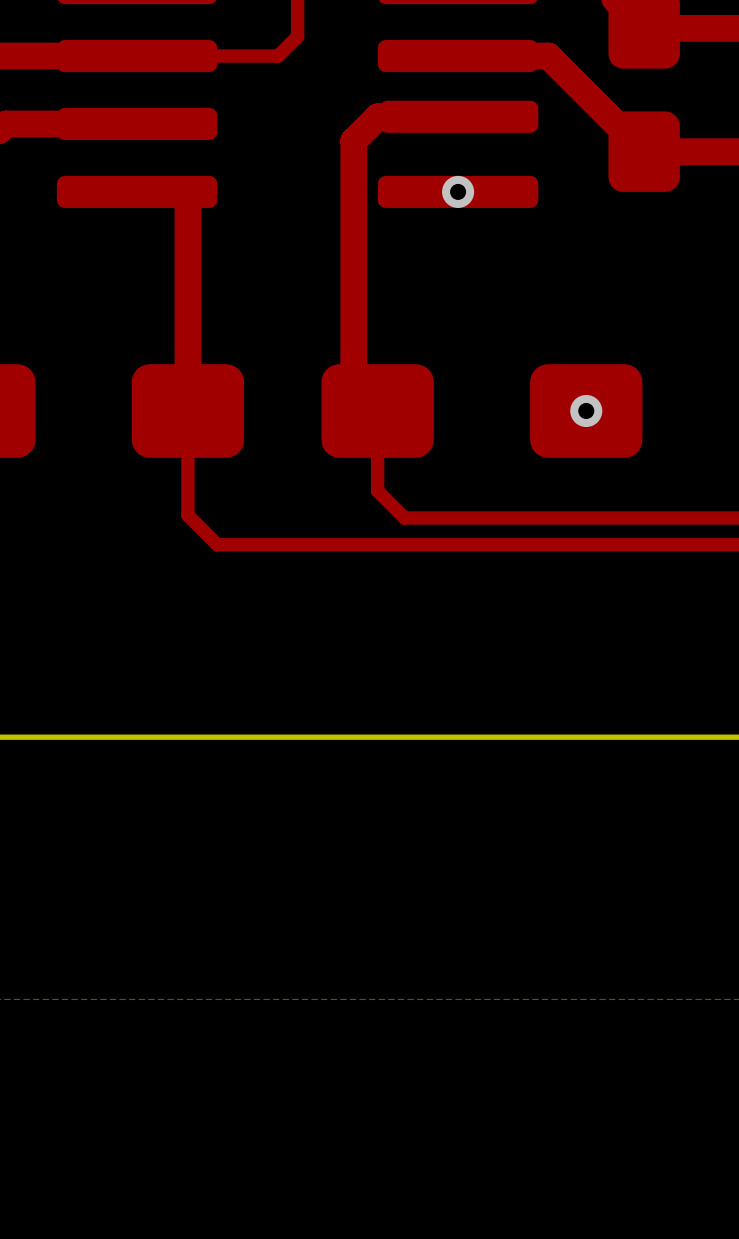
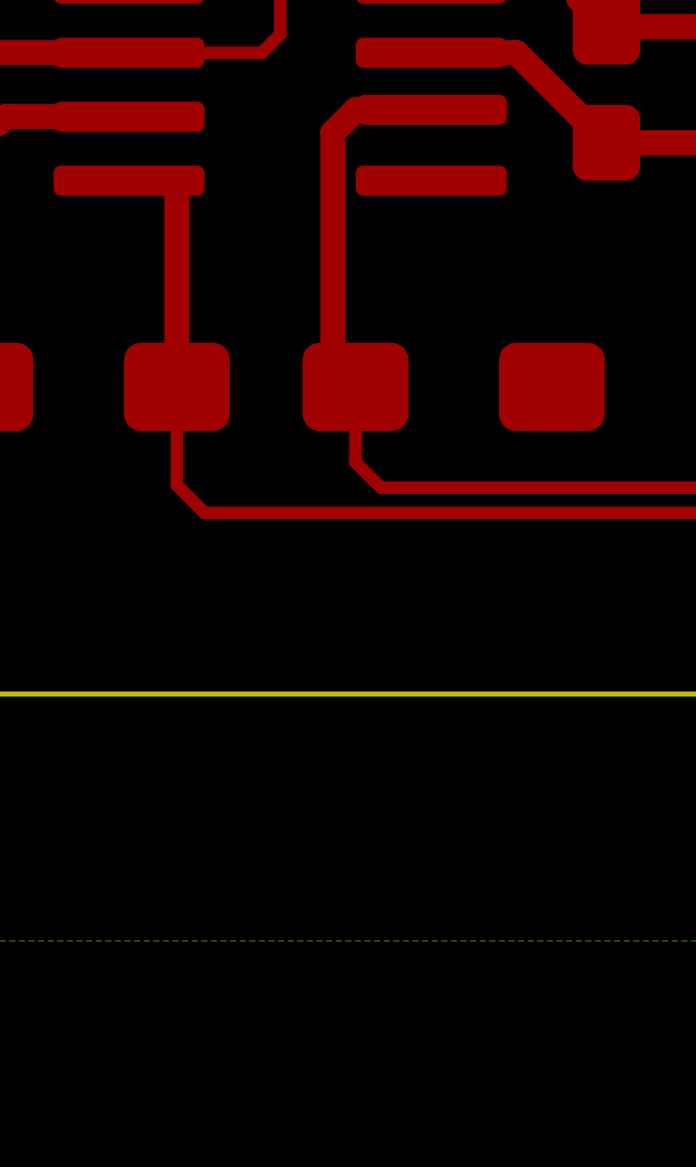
via: (458, 191) -> none
via: (586, 410) -> none

